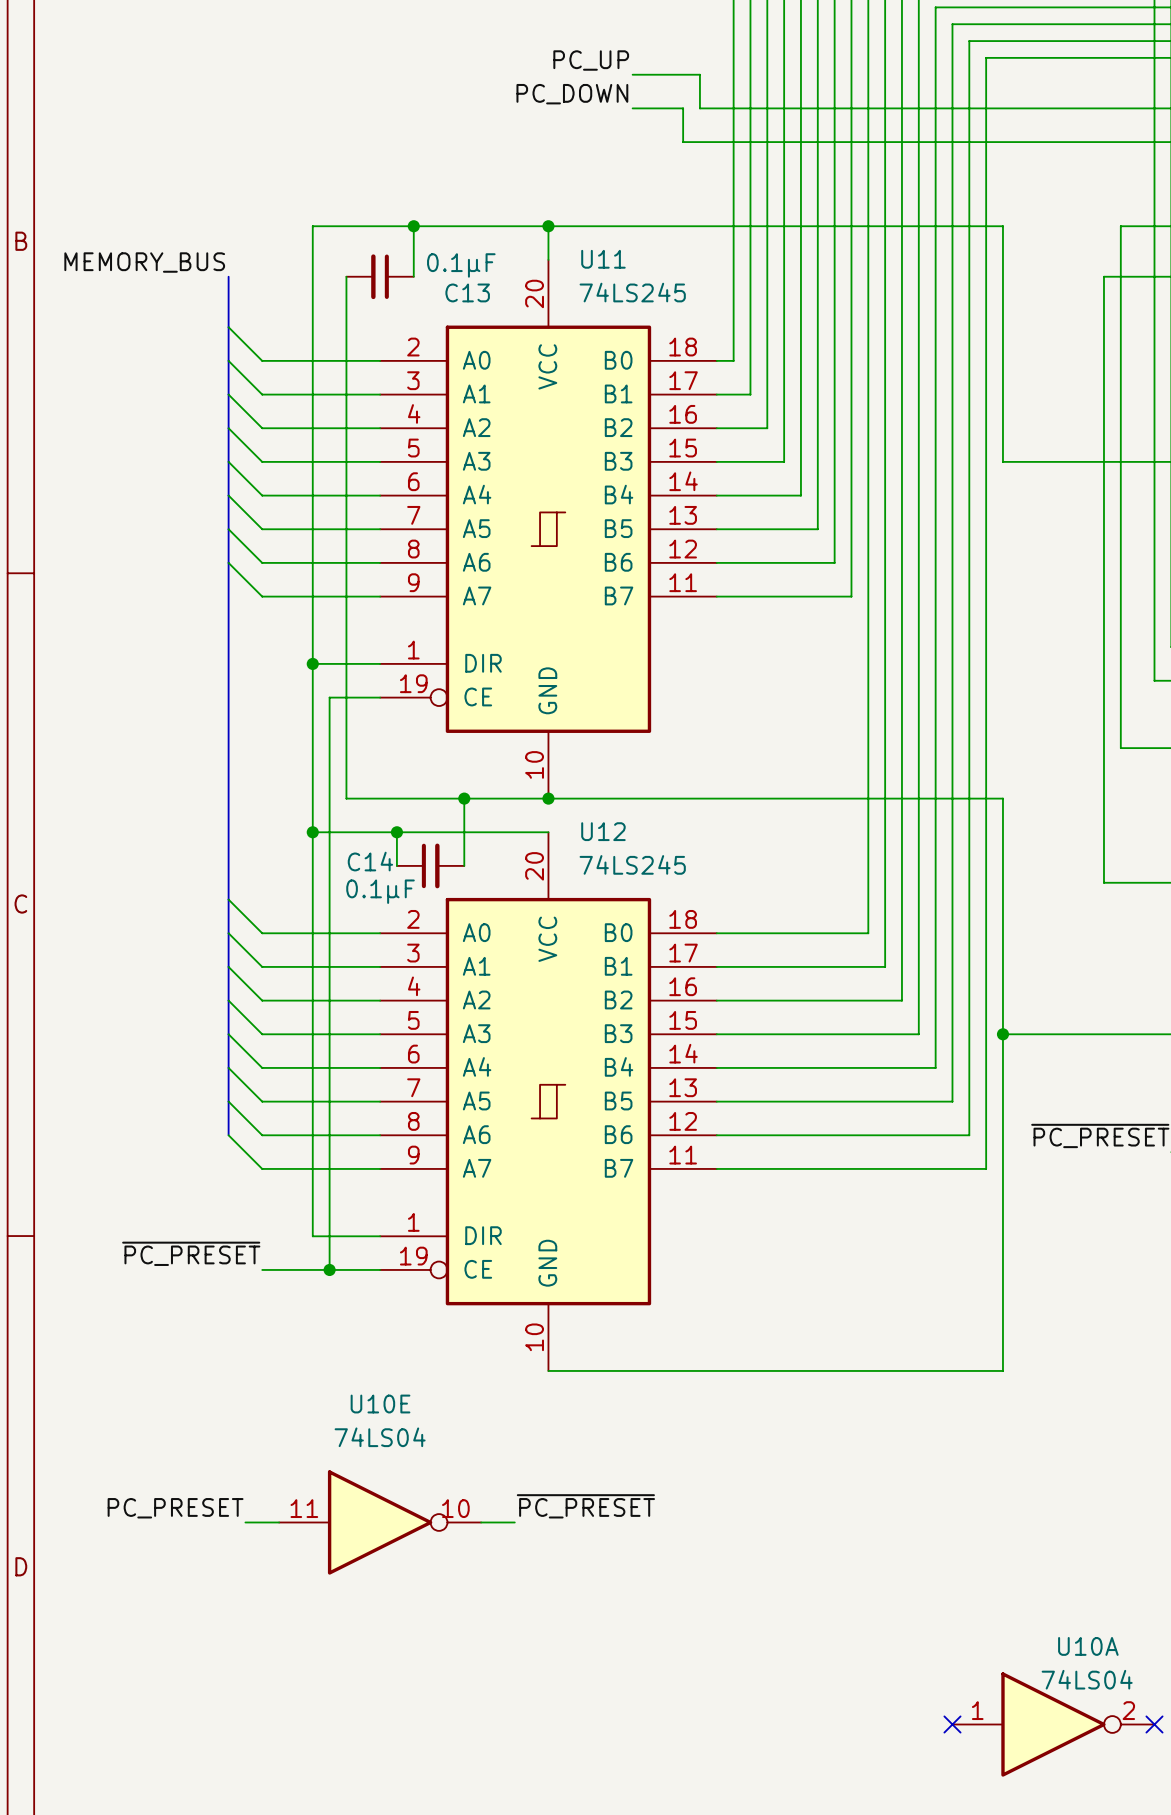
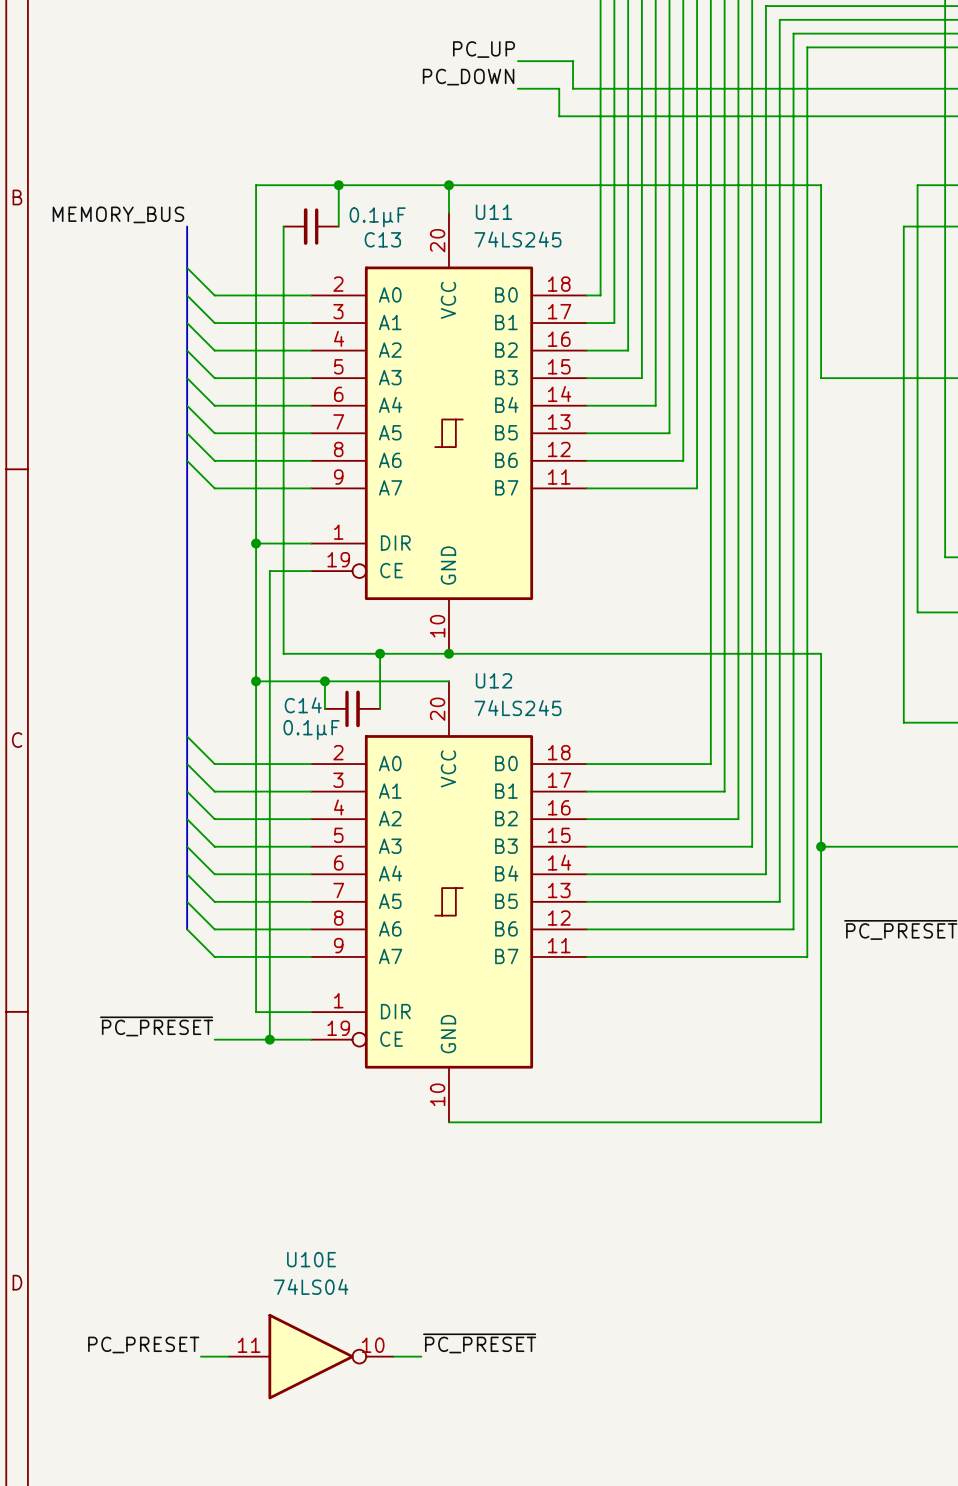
label position: ~{PC_PRESET} (585, 1506) -> ~{PC_PRESET} (479, 1343)
label position: PC_PRESET (175, 1508) -> PC_PRESET (143, 1344)
wire: (245, 1522) (279, 1522) -> (200, 1356) (228, 1356)
U10E position: (380, 1522) -> (311, 1356)
wire: (481, 1522) (514, 1522) -> (393, 1356) (421, 1356)
no-connect mark: (952, 1724) -> none
U10A: 74LS04 (1053, 1724) -> none
no-connect mark: (1154, 1724) -> none

